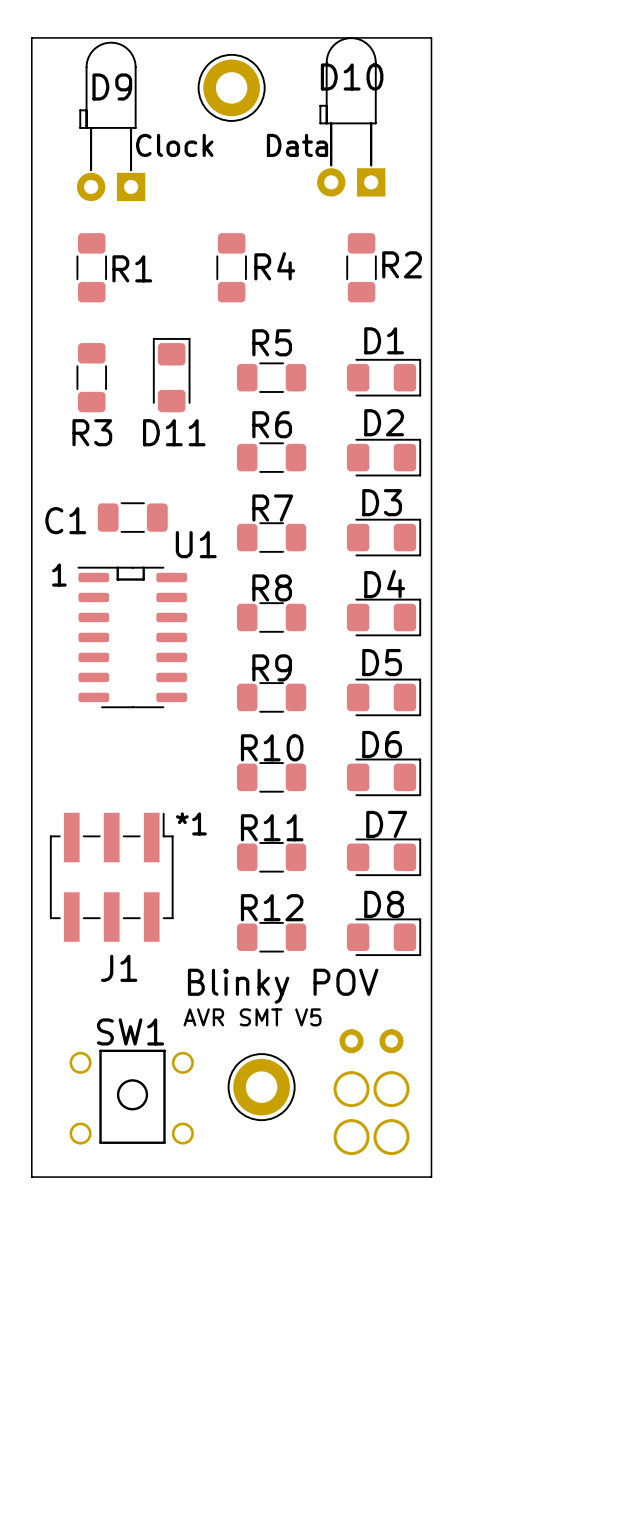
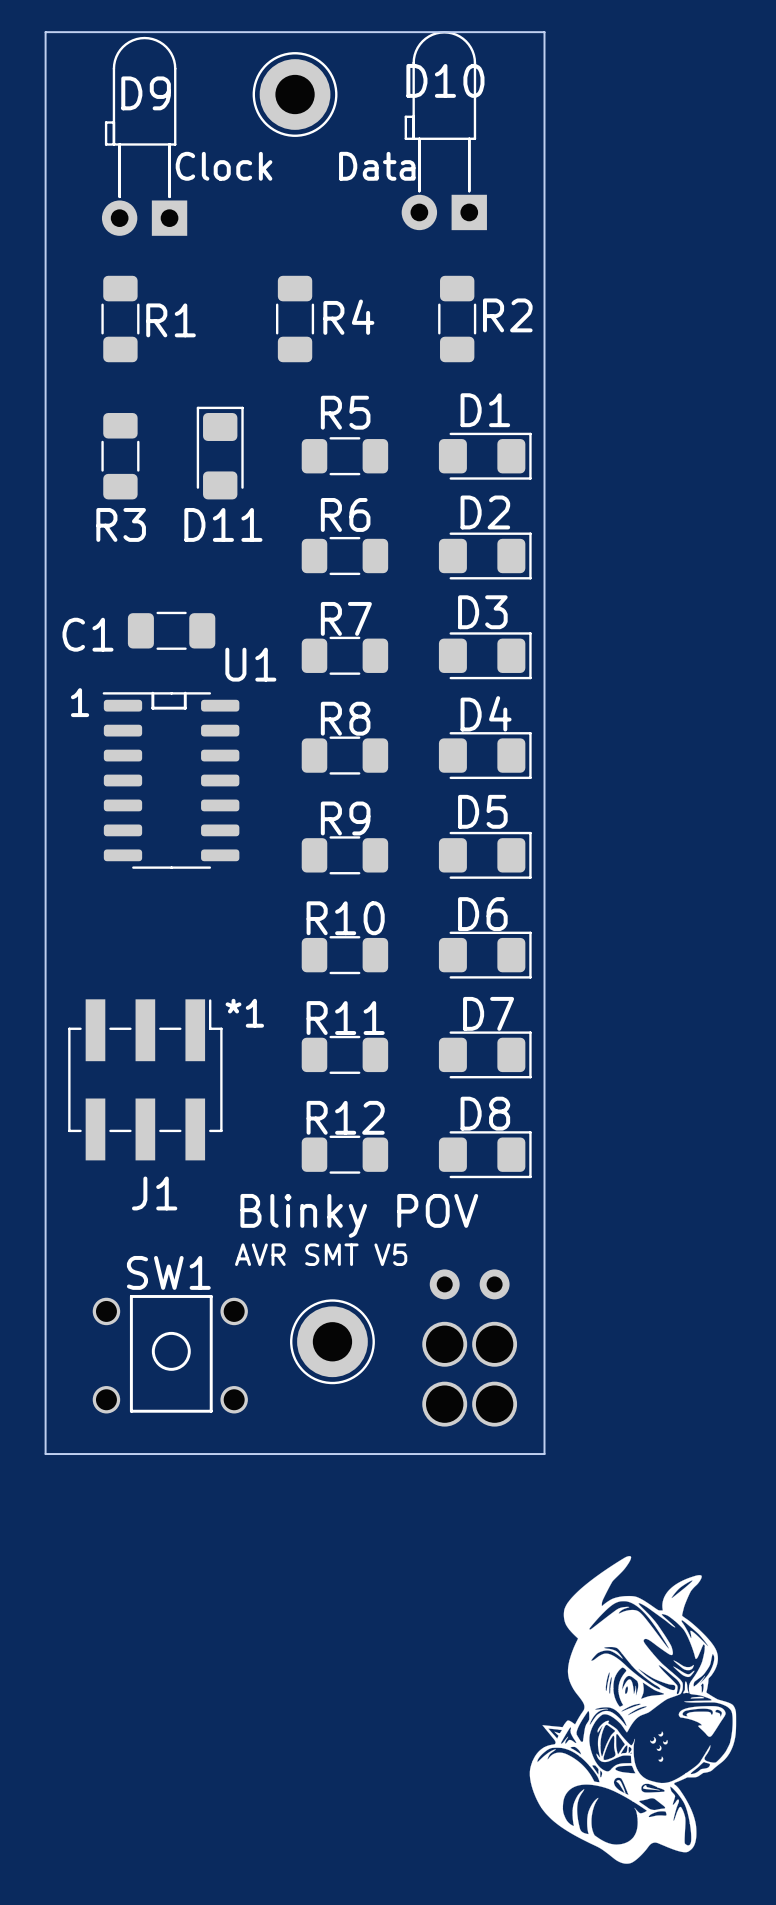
drawing: none -> [529, 1556, 737, 1864]

